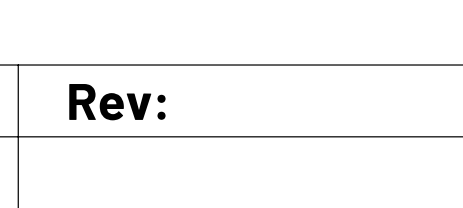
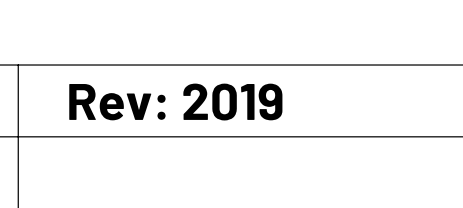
title block: Rev: (117, 102) -> Rev: 2019 (175, 102)

